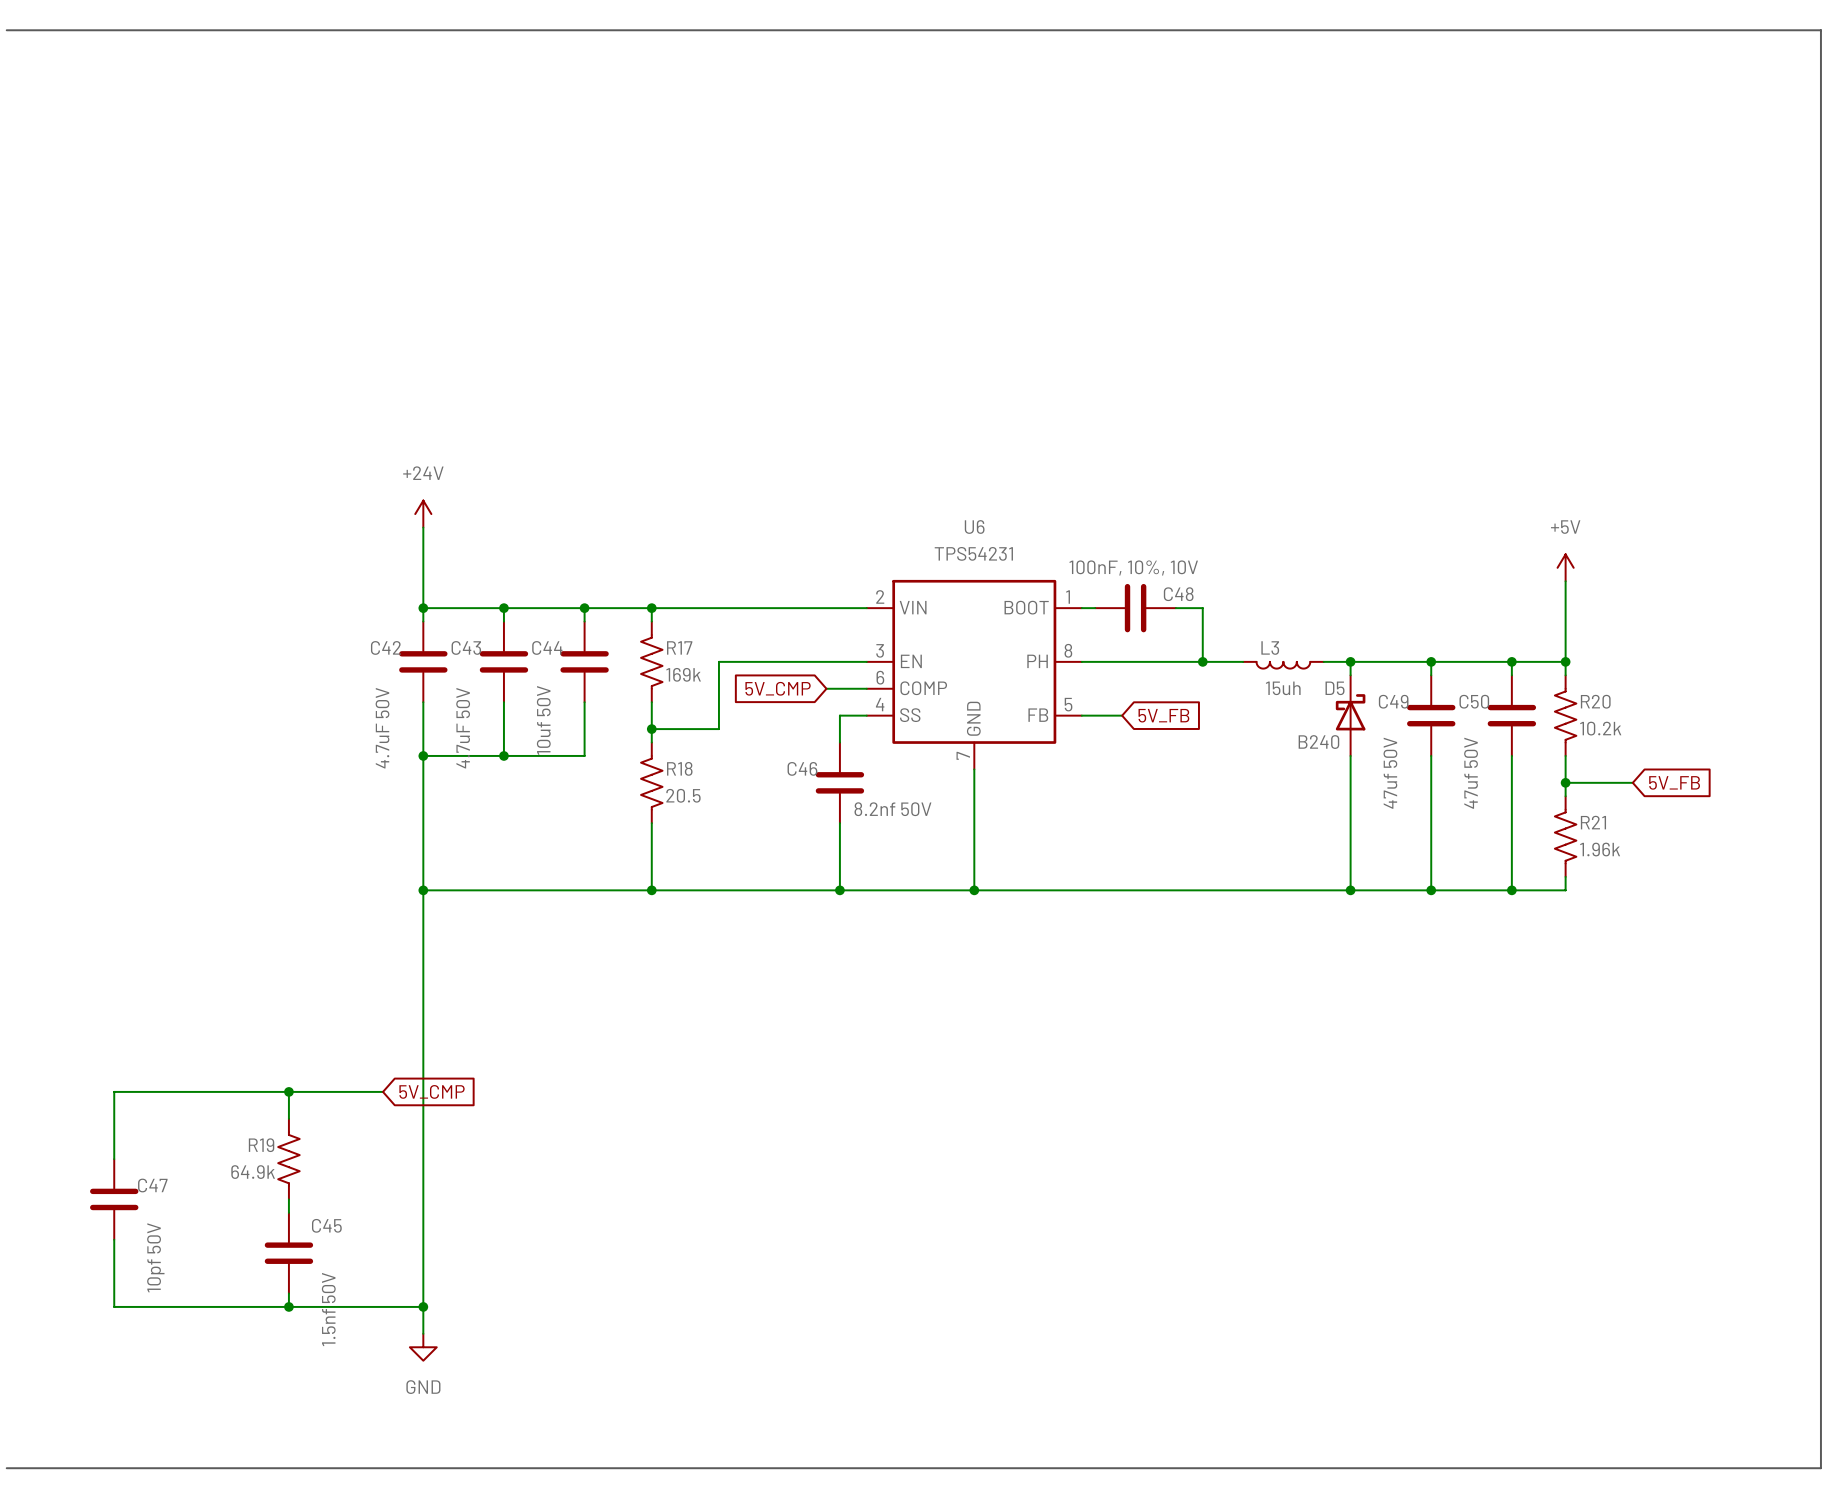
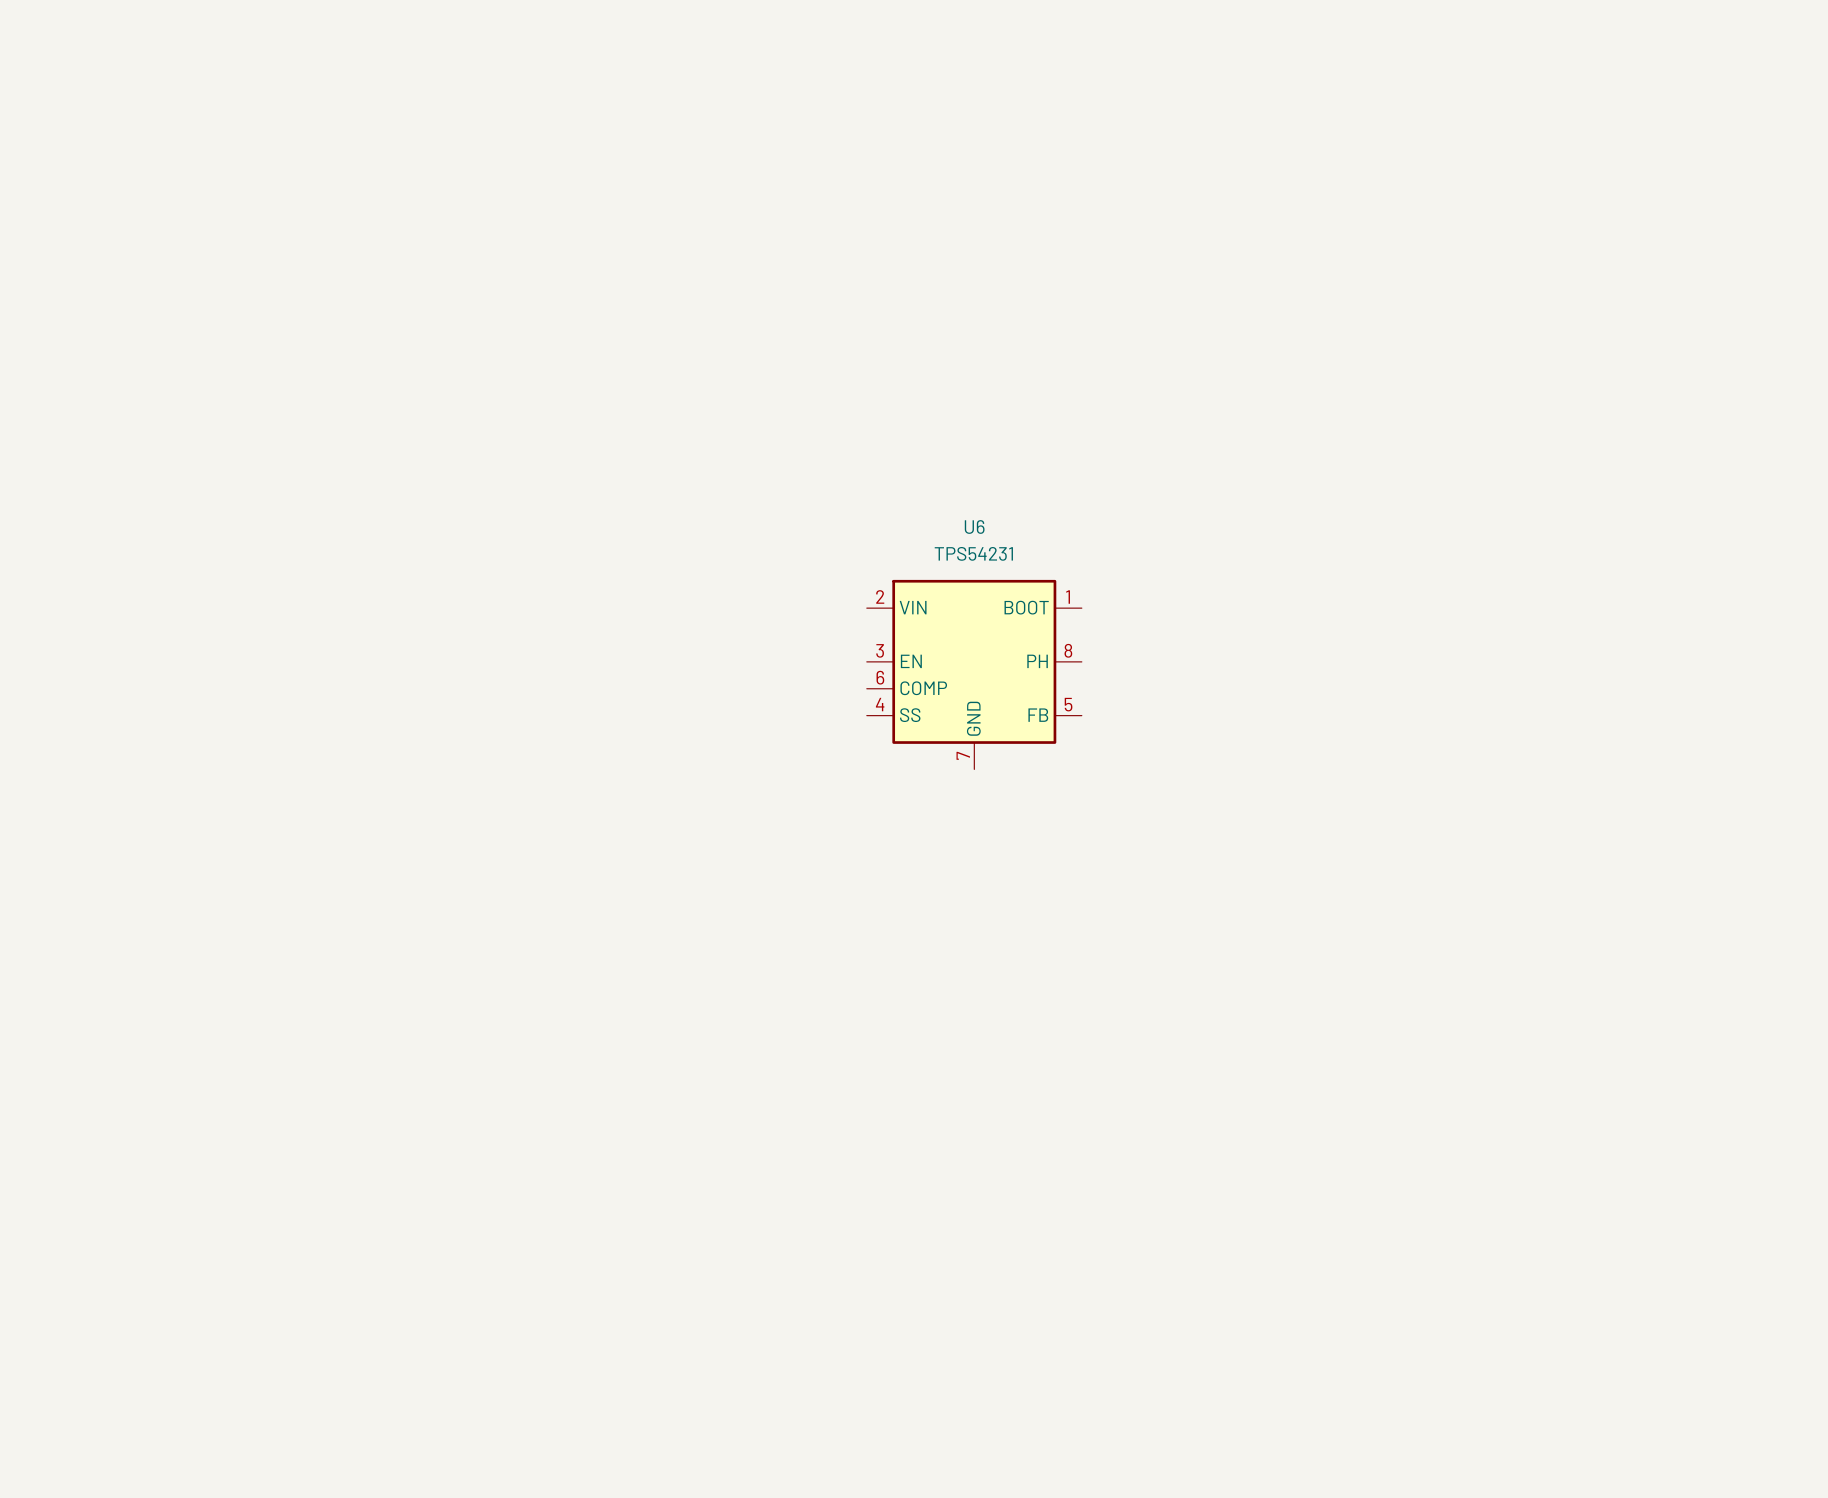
line: (6, 30) (1820, 30) (1820, 1468) (6, 1468) -> none
power symbol: +24V (423, 514) -> none
wire: (423, 527) (423, 621) -> none
power symbol: +5V (1565, 567) -> none
wire: (1565, 581) (1565, 675) -> none
wire: (423, 608) (866, 608) -> none
junction: (423, 608) -> none
wire: (503, 608) (503, 621) -> none
junction: (503, 608) -> none
wire: (584, 608) (584, 621) -> none
junction: (584, 608) -> none
wire: (651, 608) (651, 621) -> none
junction: (651, 608) -> none
wire: (1081, 608) (1095, 608) -> none
C48: 100nF, 10%, 10V (1135, 608) -> none
wire: (1175, 608) (1202, 608) (1202, 661) -> none
C42: 4.7uF 50V (423, 661) -> none
C43: 4.7uF 50V (503, 661) -> none
C44: 10uf 50V (584, 661) -> none
R17: 169k (651, 661) -> none
wire: (866, 661) (718, 661) (718, 729) (651, 729) -> none
wire: (1081, 661) (1243, 661) -> none
junction: (1202, 661) -> none
wire: (1323, 661) (1565, 661) -> none
wire: (1350, 661) (1350, 675) -> none
junction: (1350, 661) -> none
wire: (1431, 661) (1431, 675) -> none
junction: (1431, 661) -> none
wire: (1511, 661) (1511, 675) -> none
junction: (1511, 661) -> none
junction: (1565, 661) -> none
L3: 15uh (1283, 665) -> none
global label: 5V_CMP (778, 688) -> none
wire: (826, 688) (866, 688) -> none
wire: (423, 702) (423, 1333) -> none
wire: (503, 702) (503, 755) -> none
wire: (584, 702) (584, 755) (423, 755) -> none
wire: (651, 702) (651, 742) -> none
wire: (866, 715) (839, 715) (839, 742) -> none
wire: (1081, 715) (1122, 715) -> none
global label: 5V_FB (1163, 715) -> none
D5: B240 (1350, 715) -> none
C49: 47uf 50V (1431, 715) -> none
C50: 47uf 50V (1511, 715) -> none
R20: 10.2k (1565, 715) -> none
junction: (651, 729) -> none
junction: (423, 755) -> none
junction: (503, 755) -> none
wire: (1350, 755) (1350, 890) -> none
wire: (1431, 755) (1431, 890) -> none
wire: (1511, 755) (1511, 890) -> none
wire: (1565, 755) (1565, 796) -> none
wire: (974, 769) (974, 890) -> none
R18: 20.5 (651, 782) -> none
C46: 8.2nf 50V (839, 782) -> none
wire: (1565, 782) (1632, 782) -> none
junction: (1565, 782) -> none
global label: 5V_FB (1674, 782) -> none
wire: (651, 823) (651, 890) -> none
wire: (839, 823) (839, 890) -> none
R21: 1.96k (1565, 836) -> none
wire: (1565, 876) (1565, 890) (423, 890) -> none
junction: (423, 890) -> none
junction: (651, 890) -> none
junction: (839, 890) -> none
junction: (974, 890) -> none
junction: (1350, 890) -> none
junction: (1431, 890) -> none
junction: (1511, 890) -> none
wire: (288, 1091) (288, 1118) -> none
junction: (288, 1091) -> none
wire: (383, 1091) (114, 1091) (114, 1159) -> none
global label: 5V_CMP (432, 1091) -> none
R19: 64.9k (288, 1159) -> none
C47: 10pf 50V (114, 1199) -> none
wire: (288, 1199) (288, 1212) -> none
wire: (114, 1239) (114, 1306) (423, 1306) -> none
C45: 1.5nf 50V (288, 1253) -> none
wire: (288, 1293) (288, 1306) -> none
junction: (288, 1306) -> none
junction: (423, 1306) -> none
power symbol: GND (423, 1347) -> none

